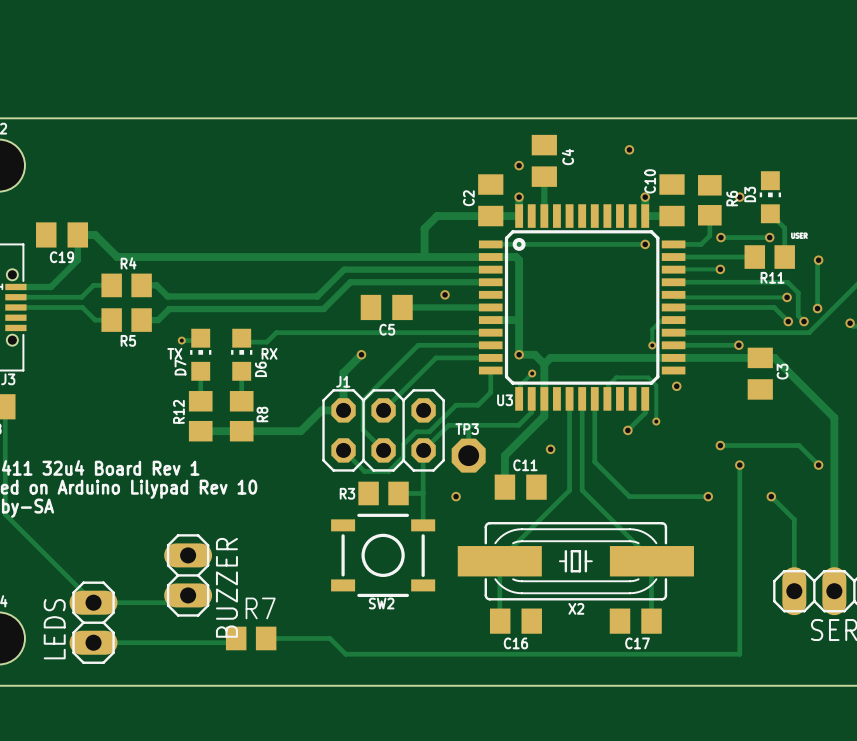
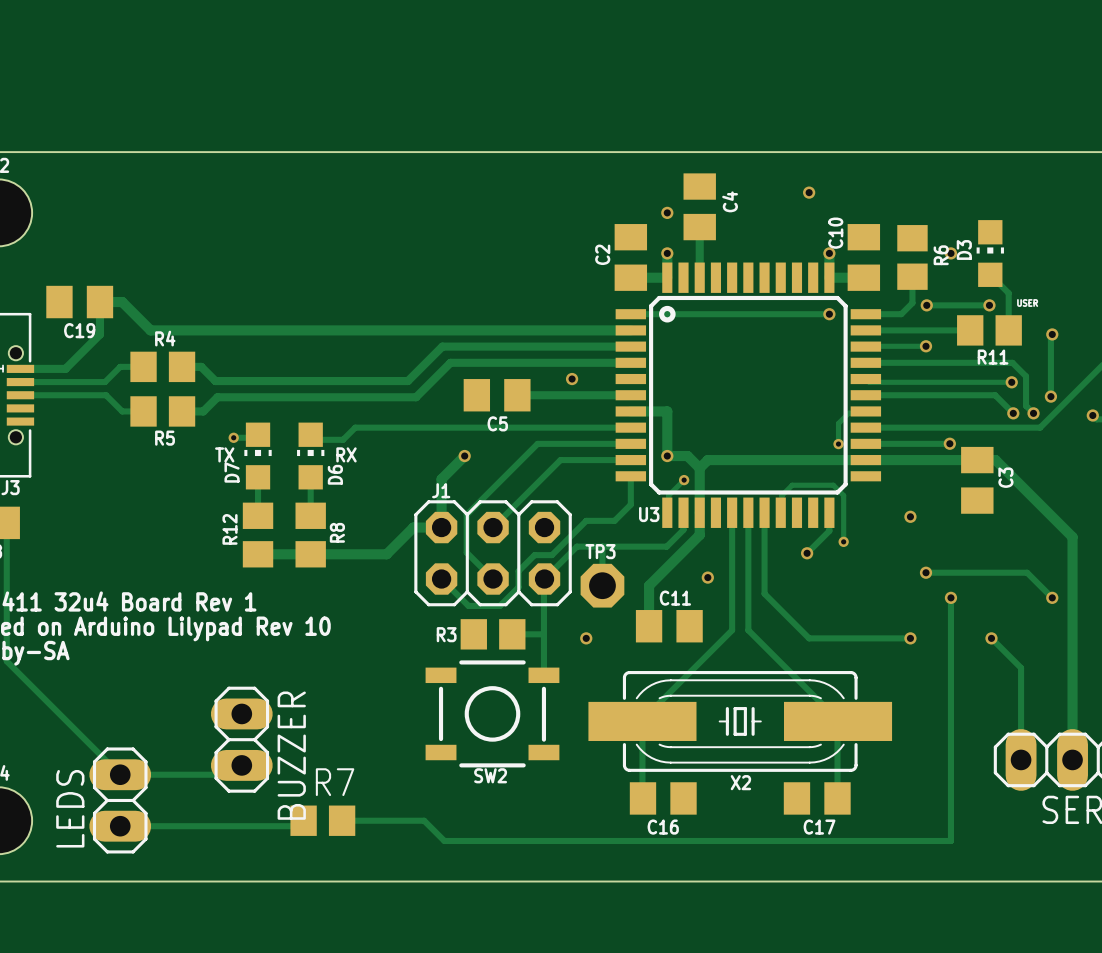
track: (490, 216) (437, 216) (424, 228) (424, 257) -> none
track: (490, 257) (515, 257) (519, 260) (519, 320) -> none
via position: (676, 386) -> (910, 516)

